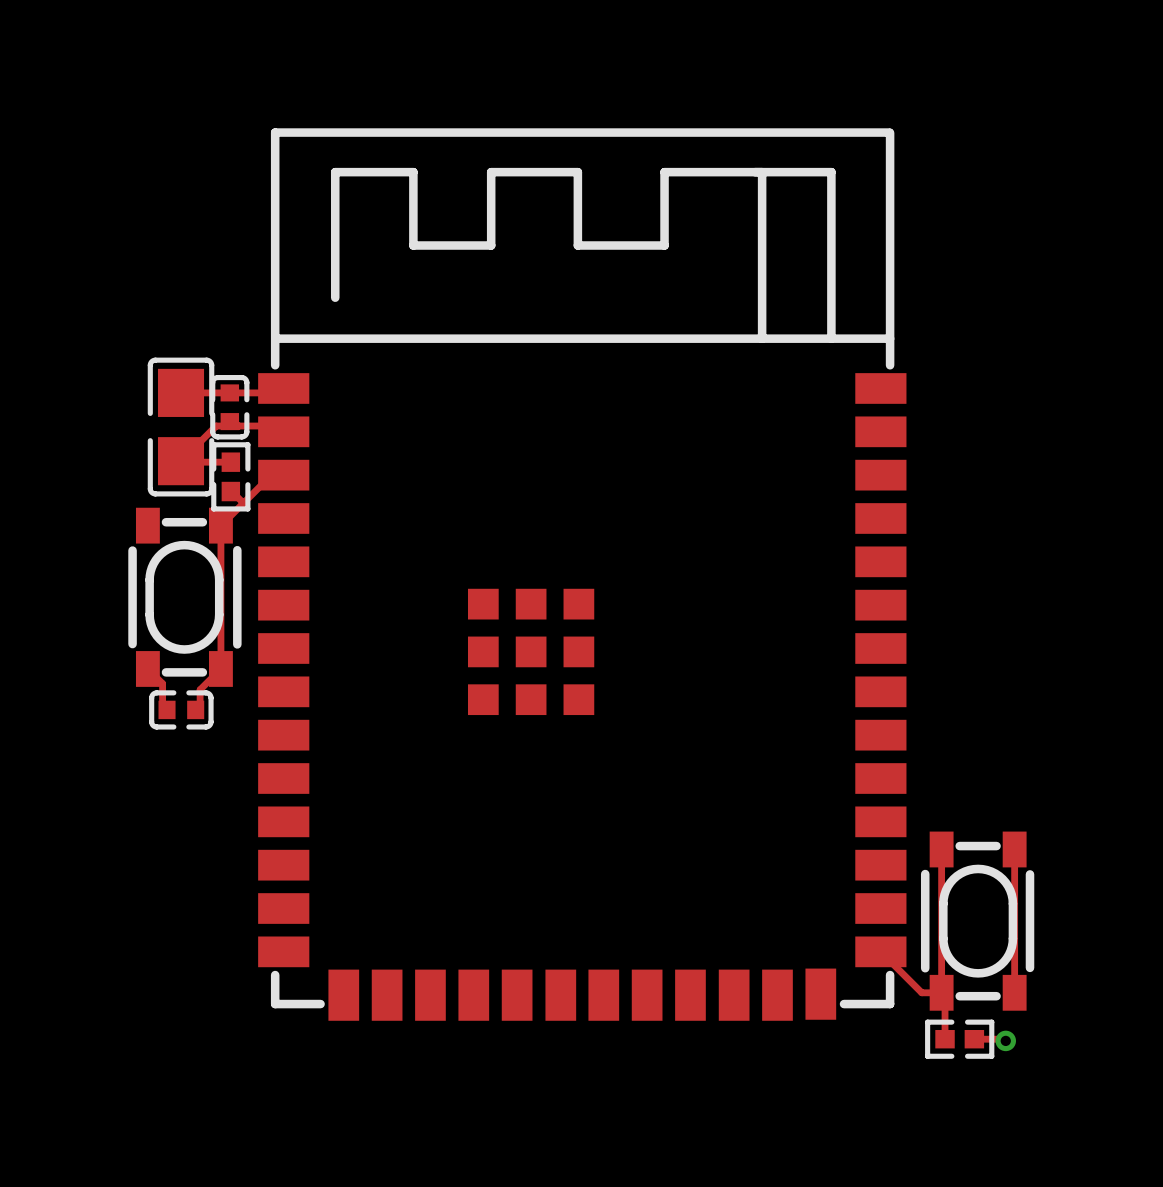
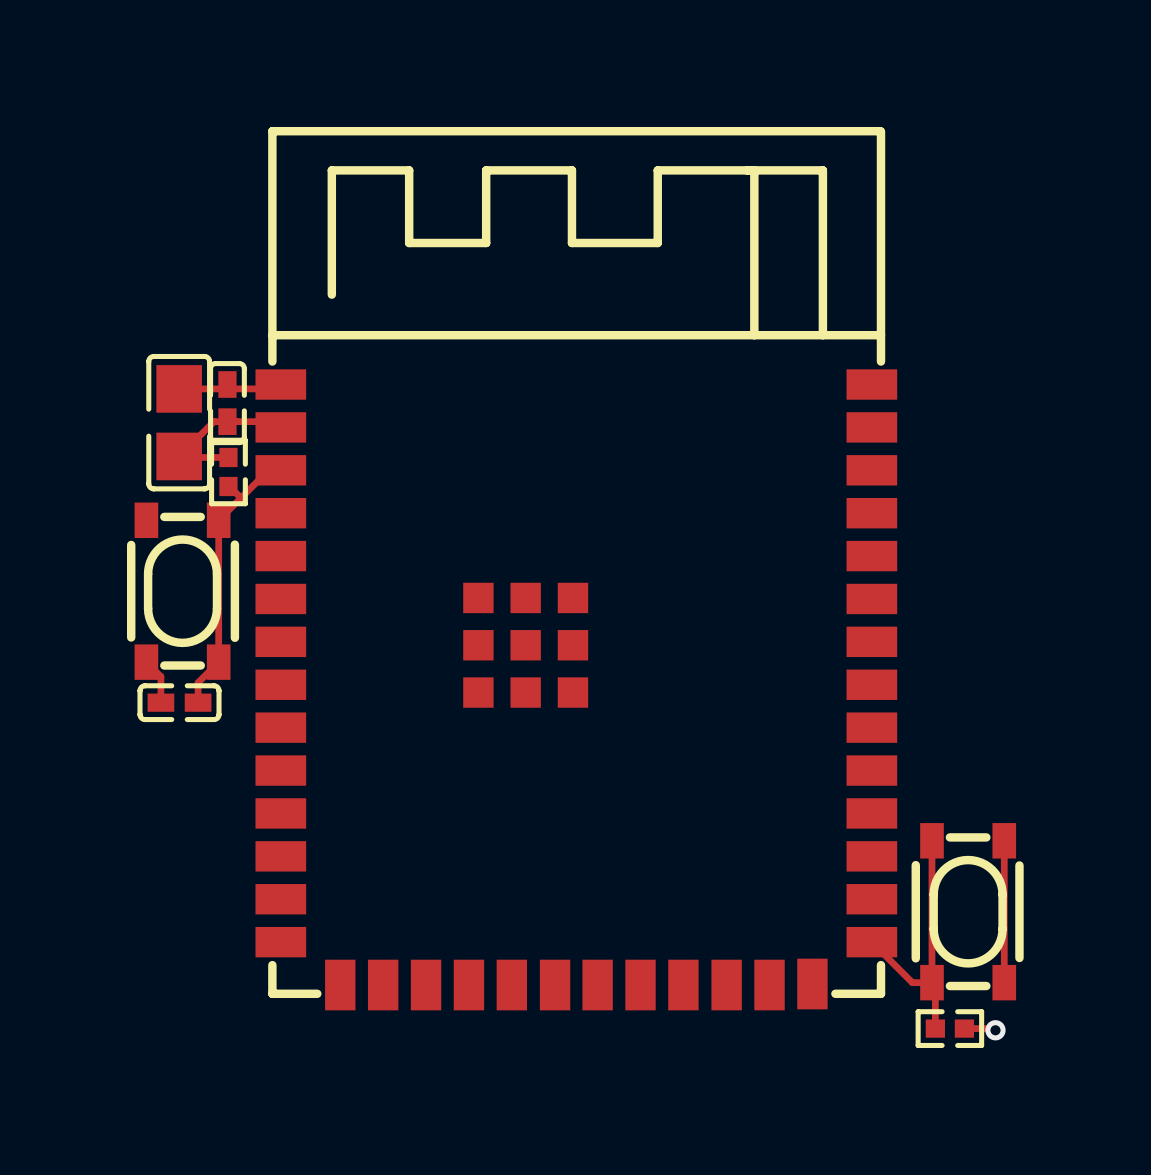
part footprint: [210, 375, 250, 440] -> [208, 361, 247, 446]
part footprint: [149, 690, 214, 730] -> [137, 683, 222, 723]

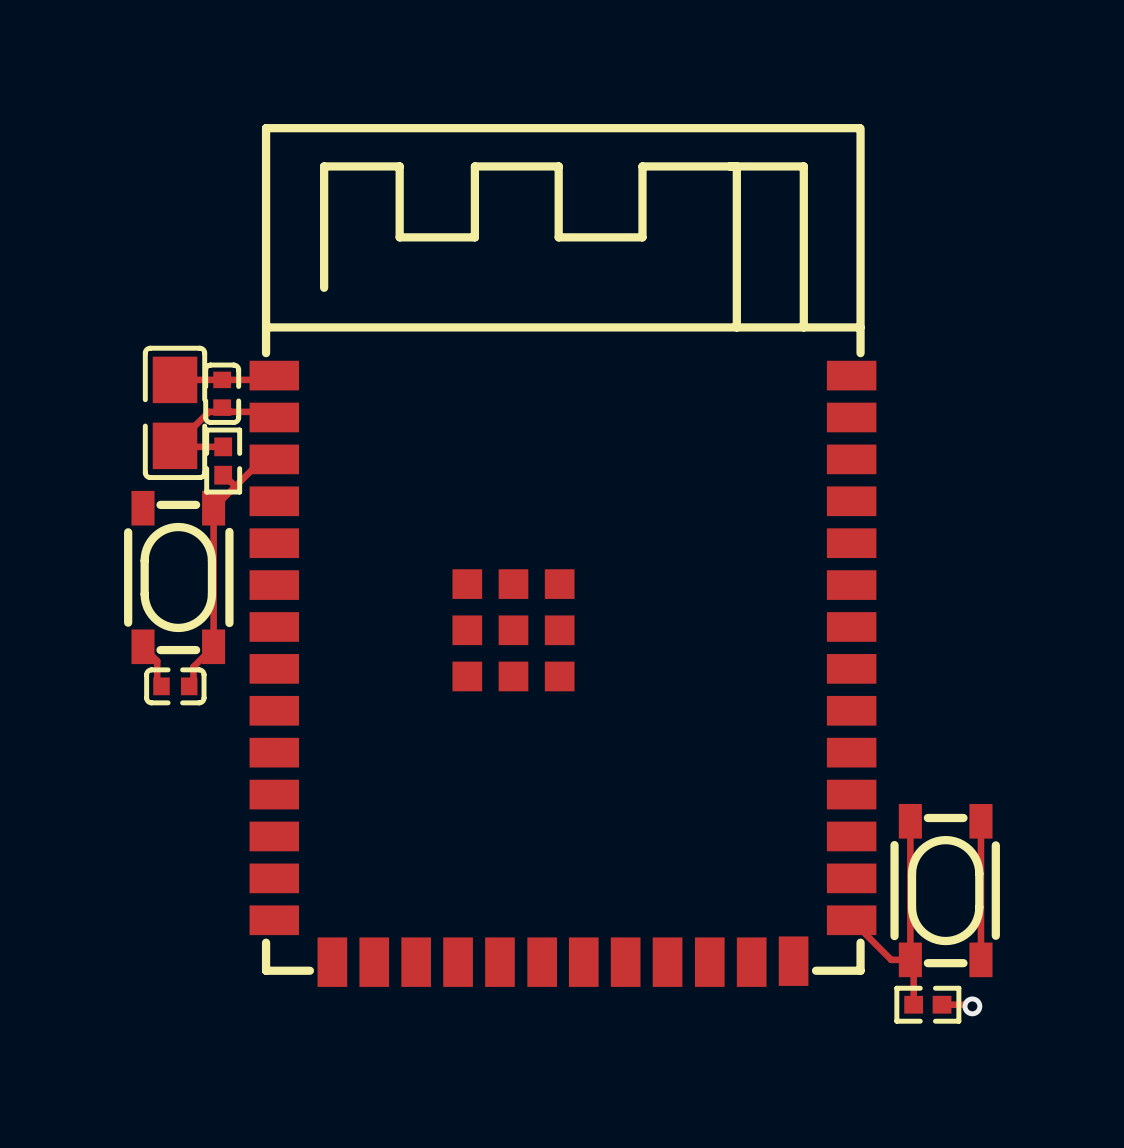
part footprint: [208, 361, 247, 446] -> [203, 362, 242, 425]
part footprint: [137, 683, 222, 723] -> [144, 667, 207, 706]

